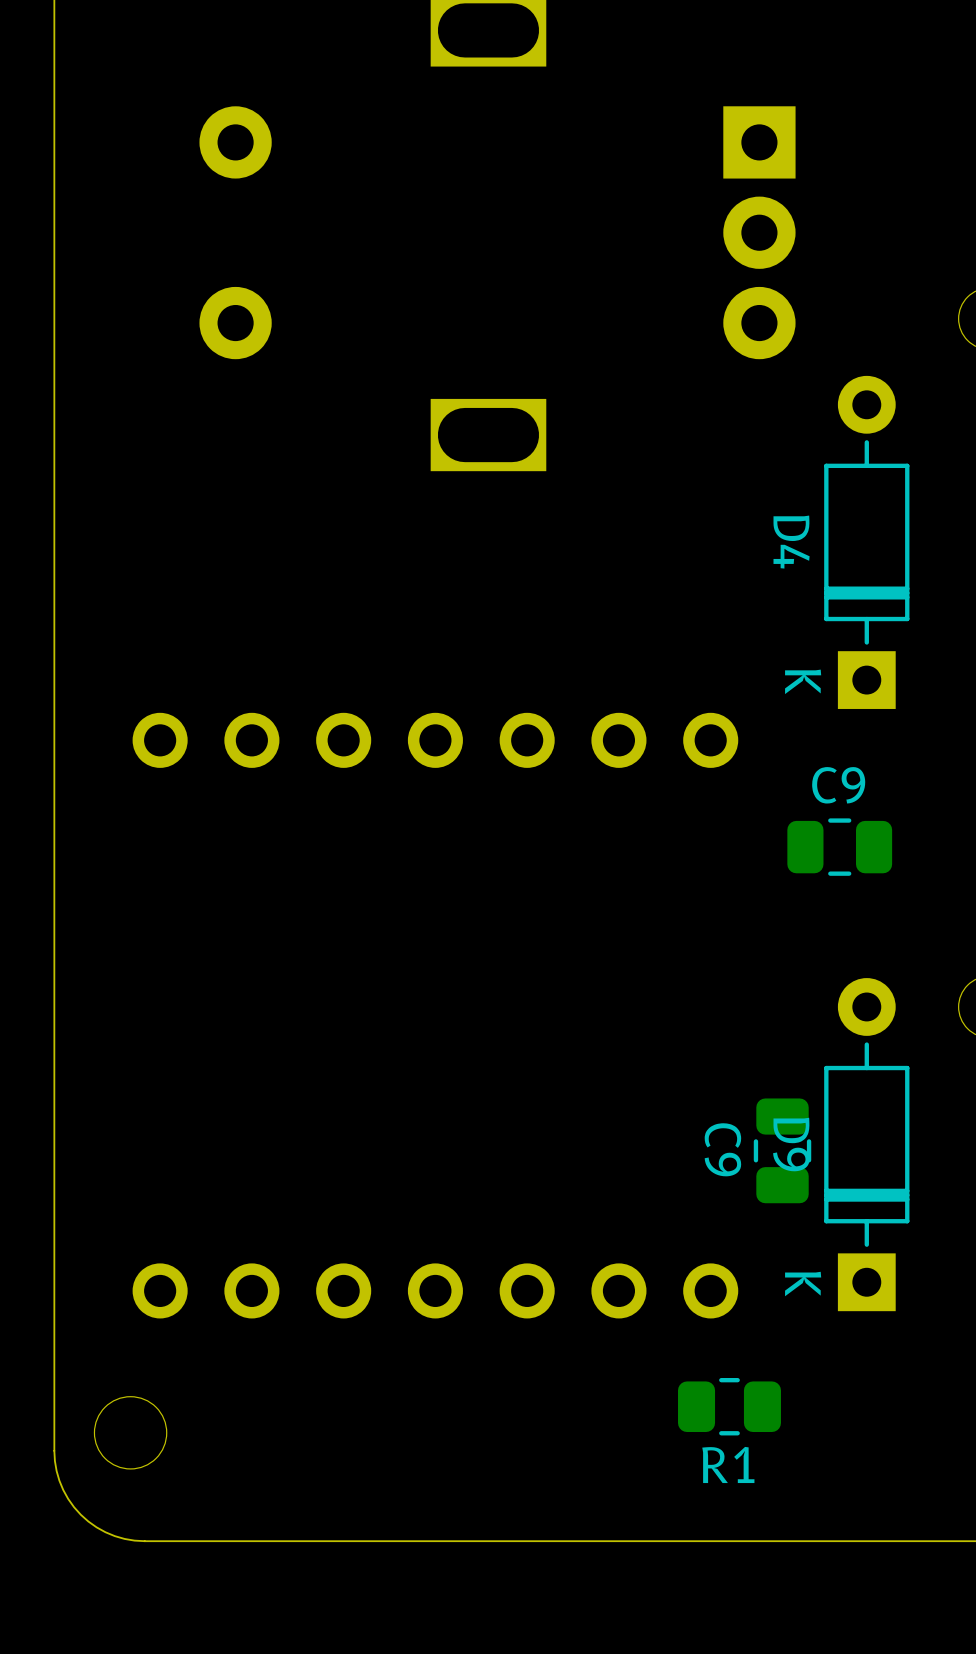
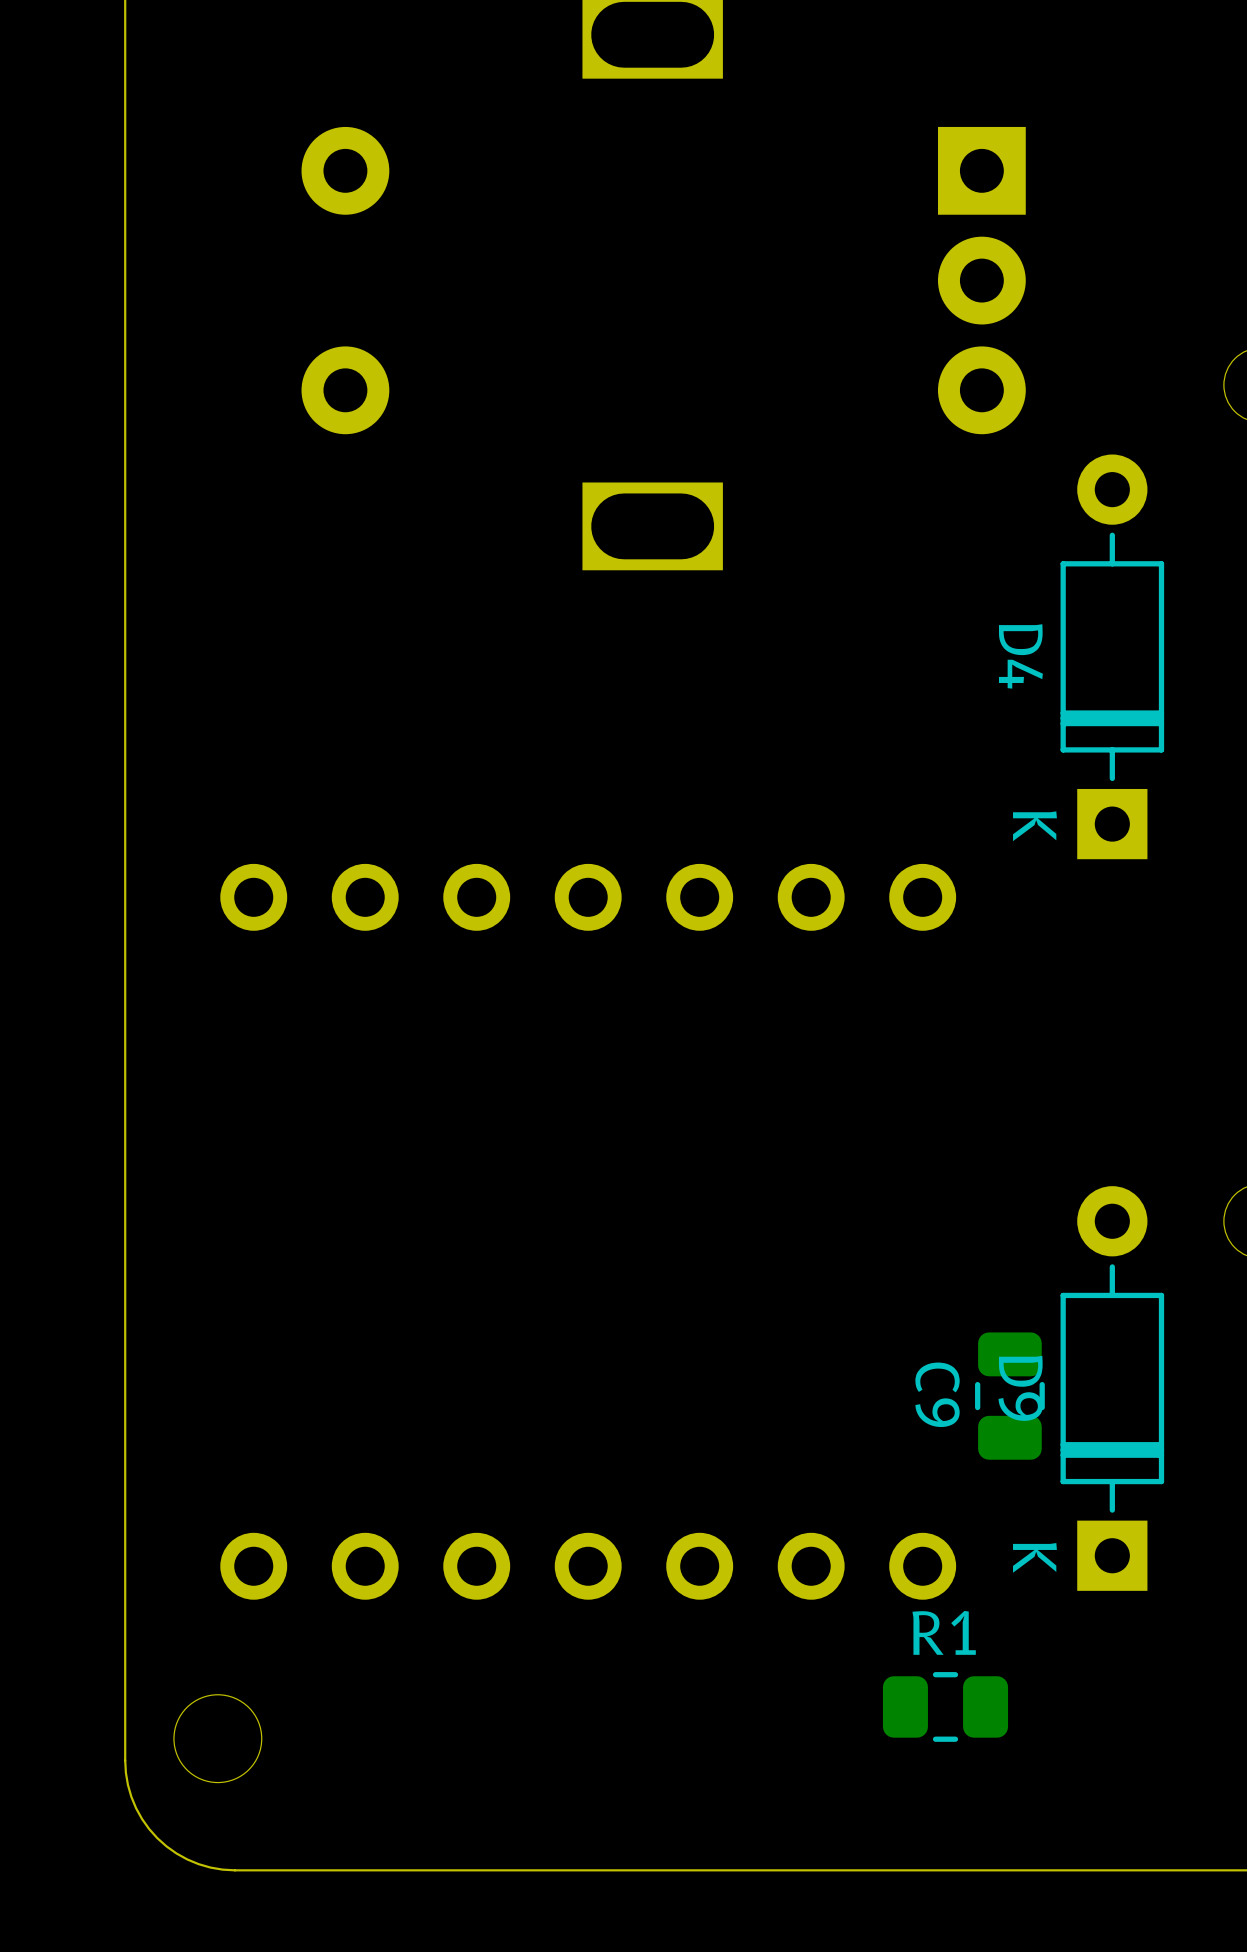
C9: (839, 847) -> none
R1 name position: R1 (728, 1464) -> R1 (944, 1632)

